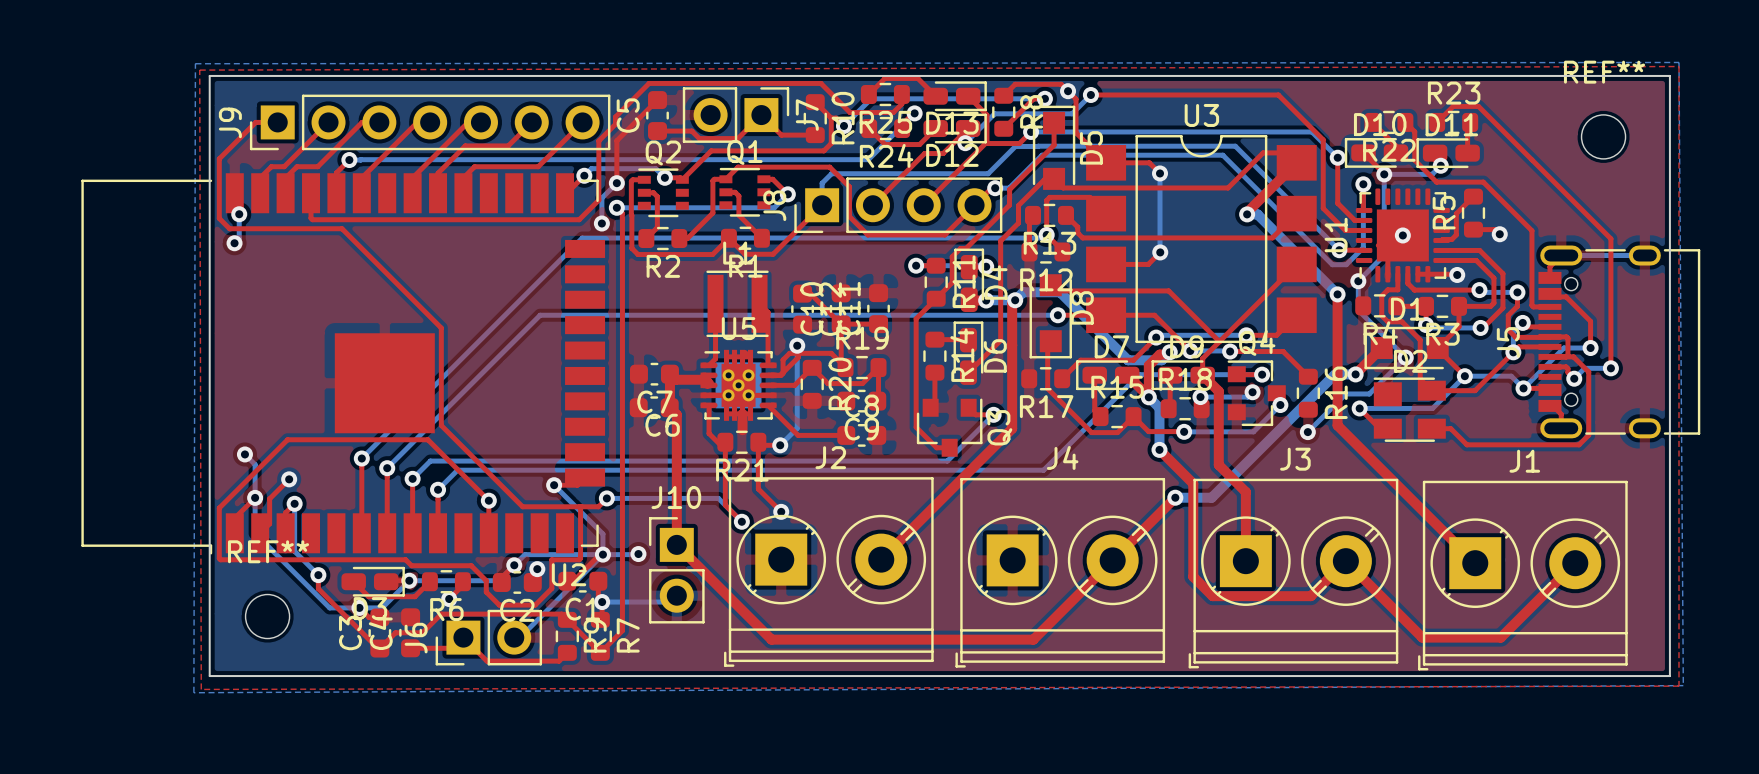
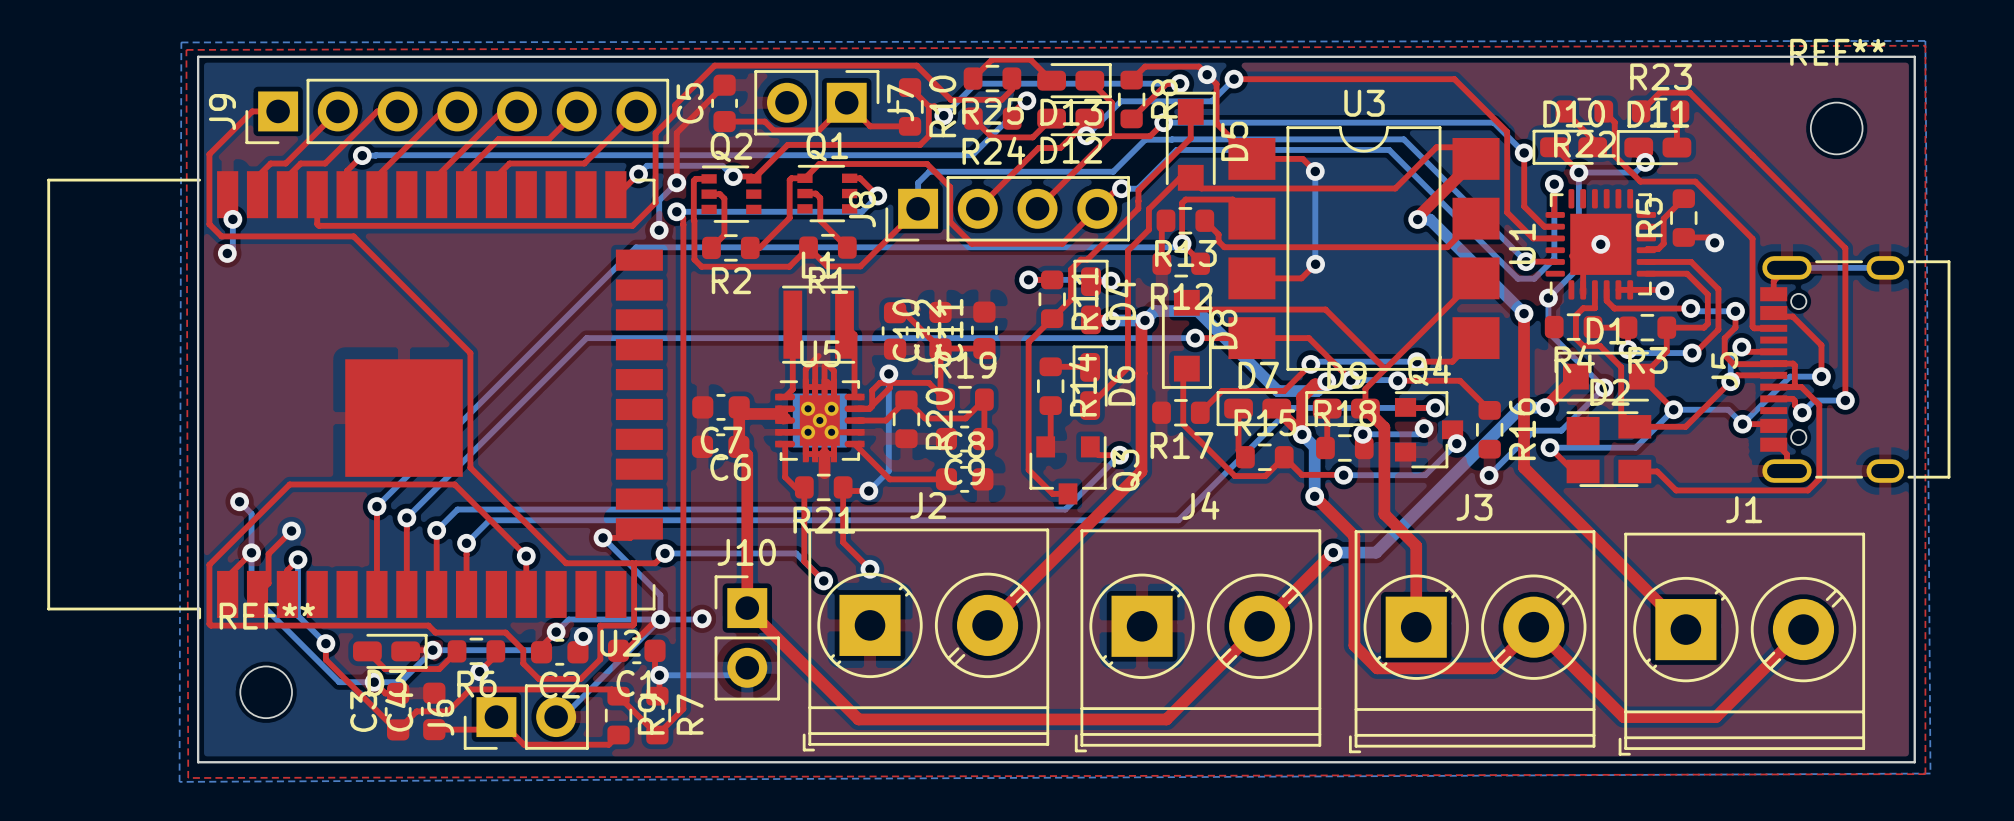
top track: none -> (818, 356) (805, 368) (805, 387)
top track: none -> (815, 359) (815, 387)
top track: none -> (826, 363) (833, 371) (833, 387)
top track: none -> (824, 366) (824, 387)

